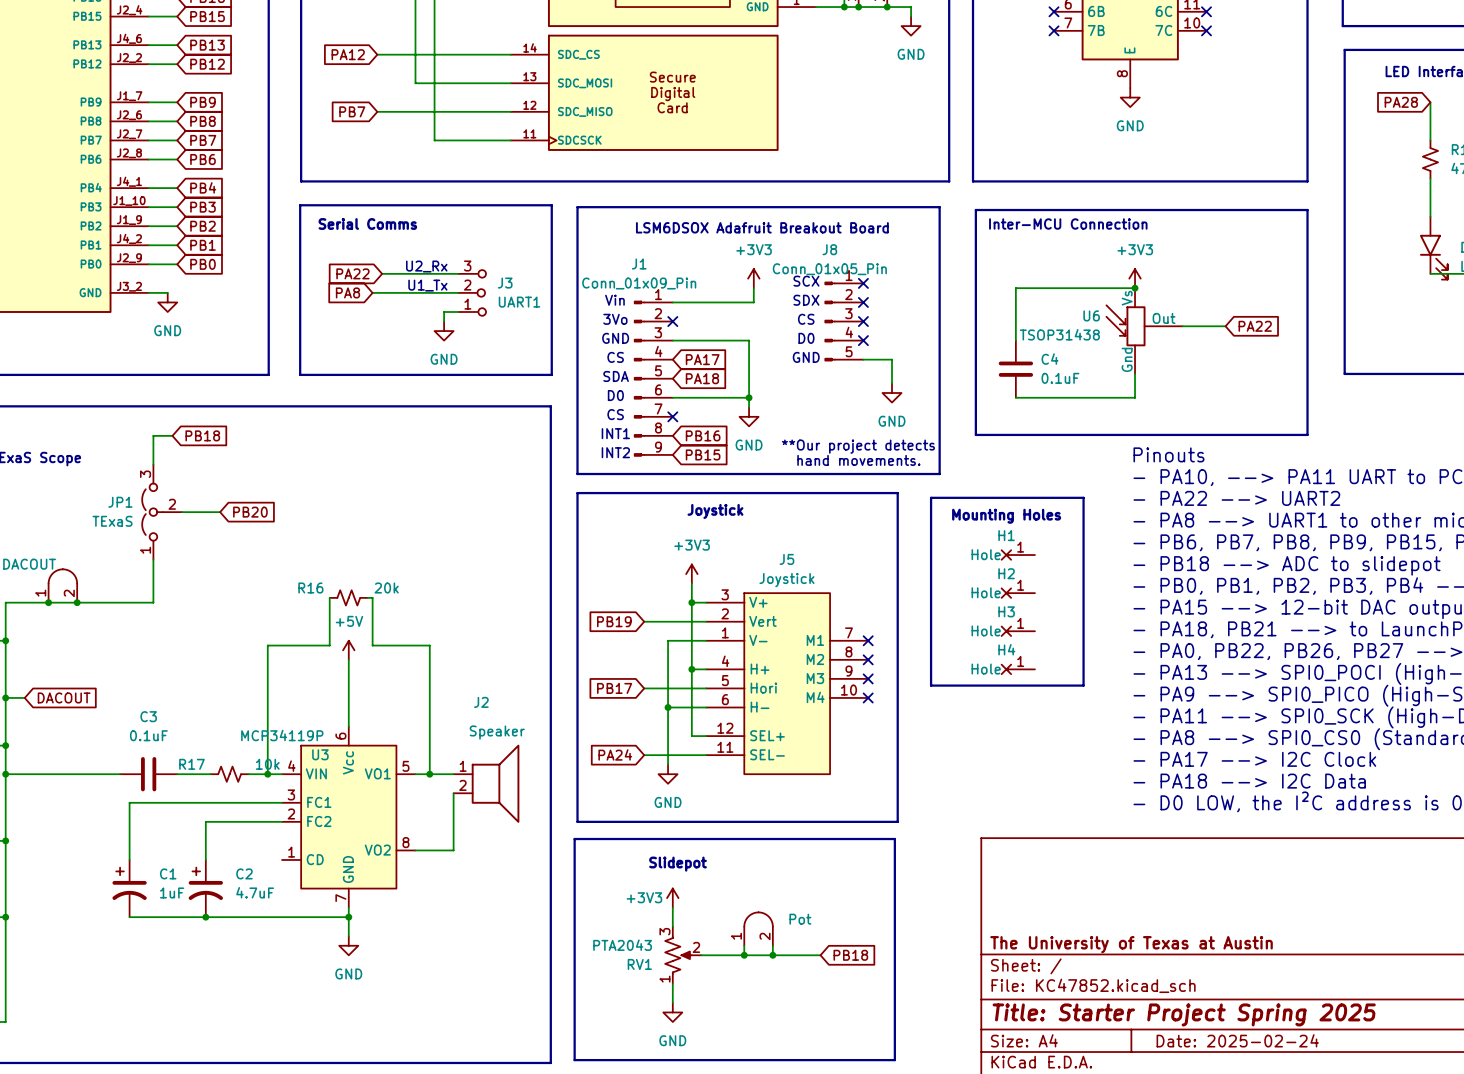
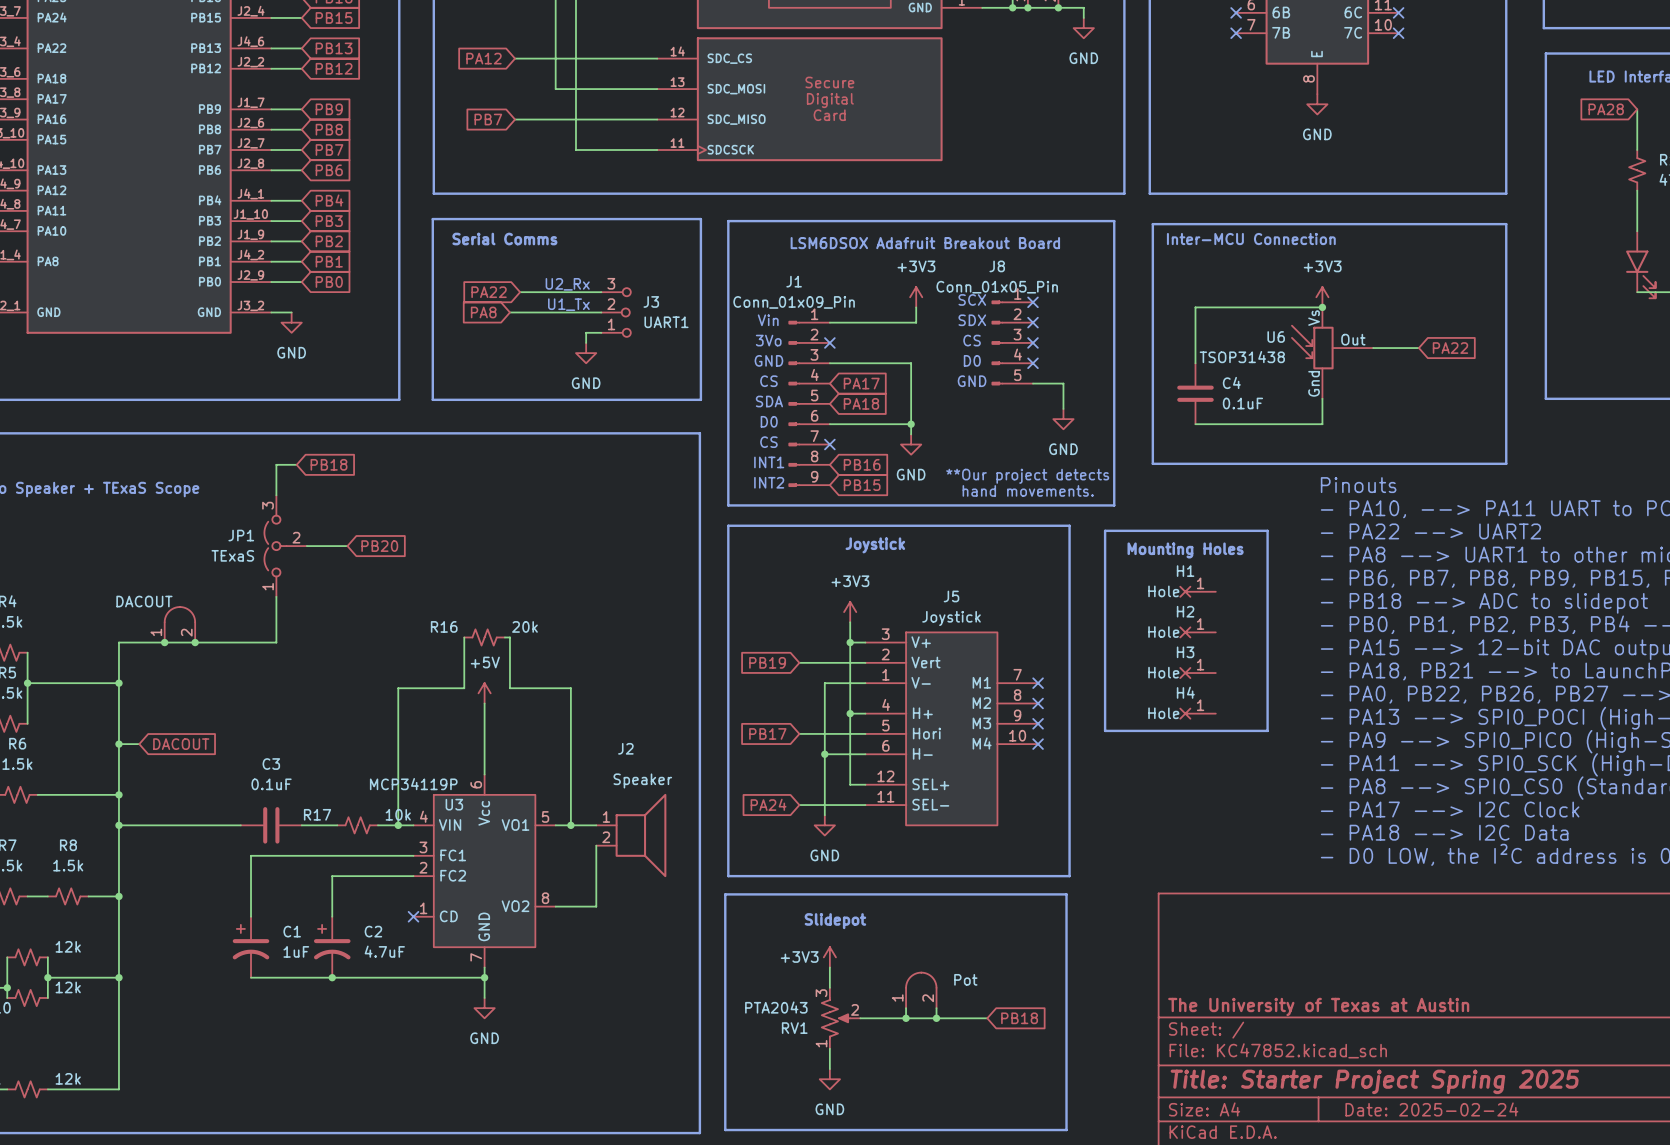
no-connect mark: none -> (413, 916)

